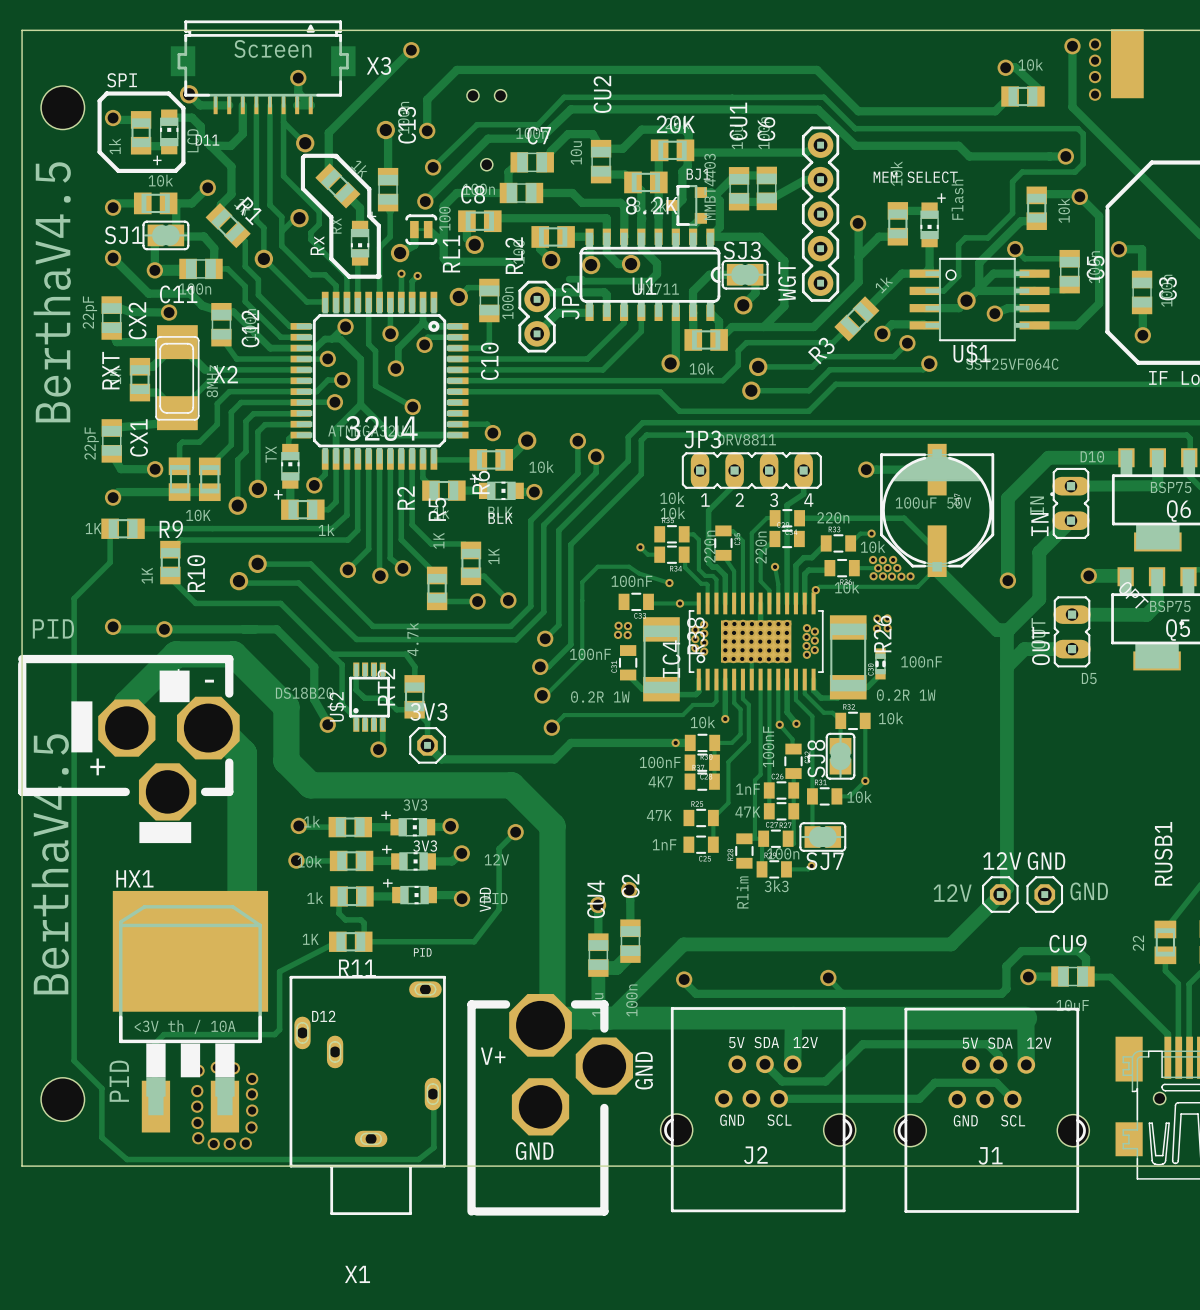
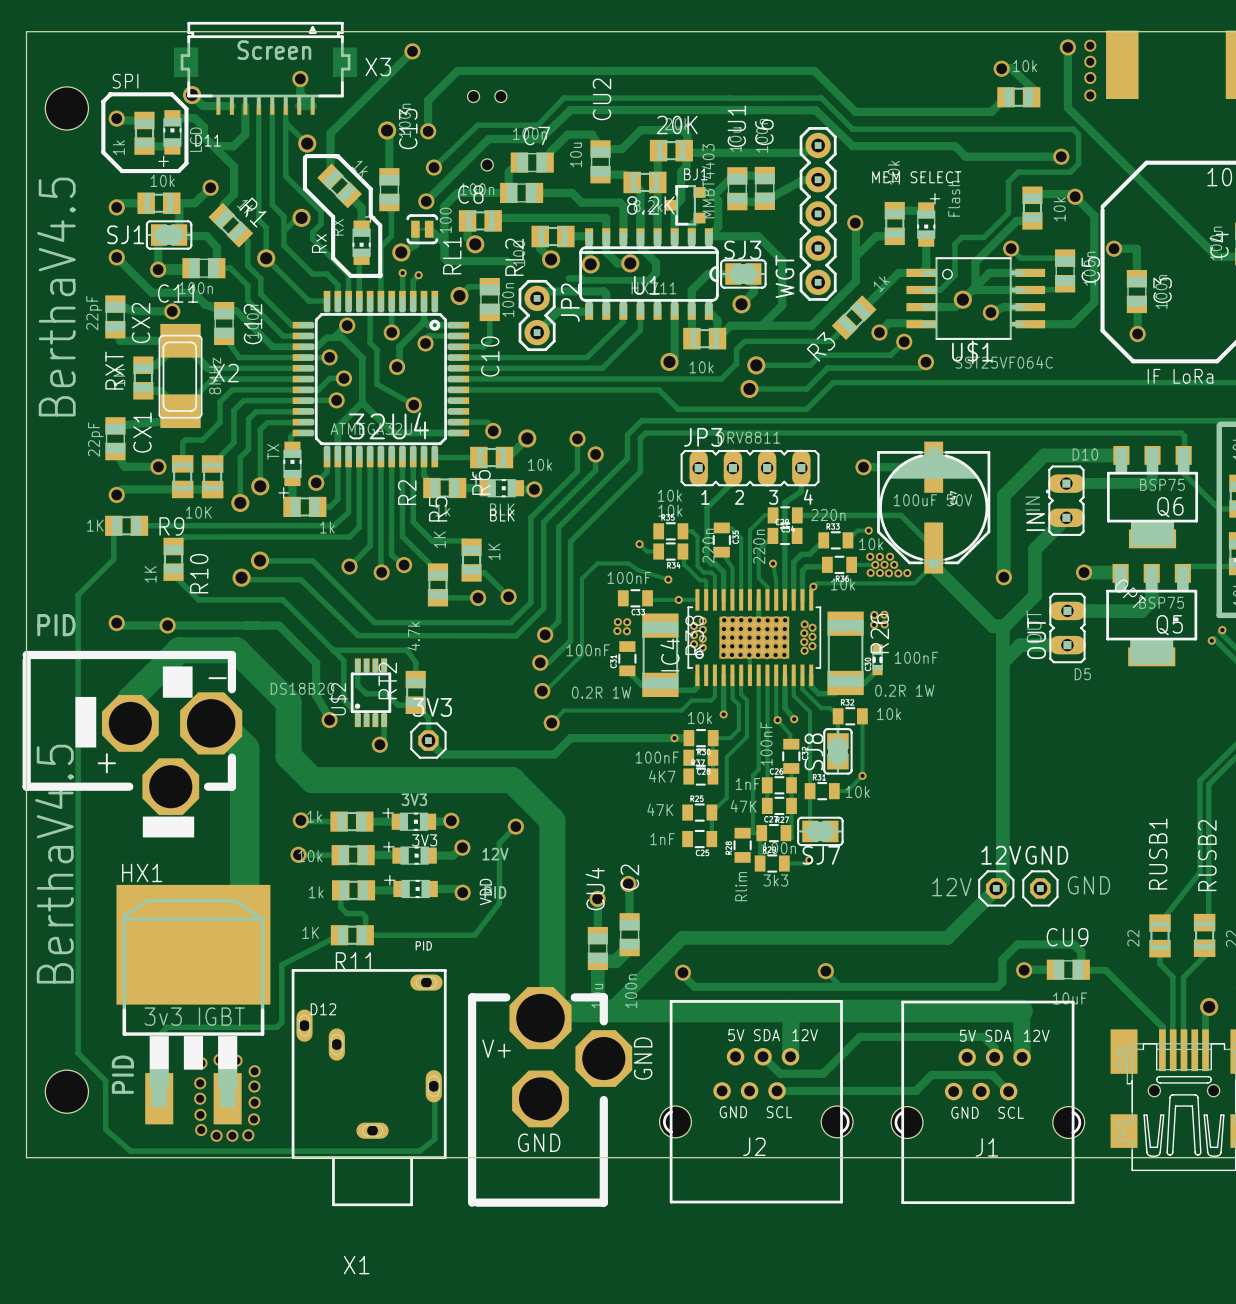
HX1 value: <3V th / 10A (185, 1026) -> 3v3 IGBT (194, 1016)

